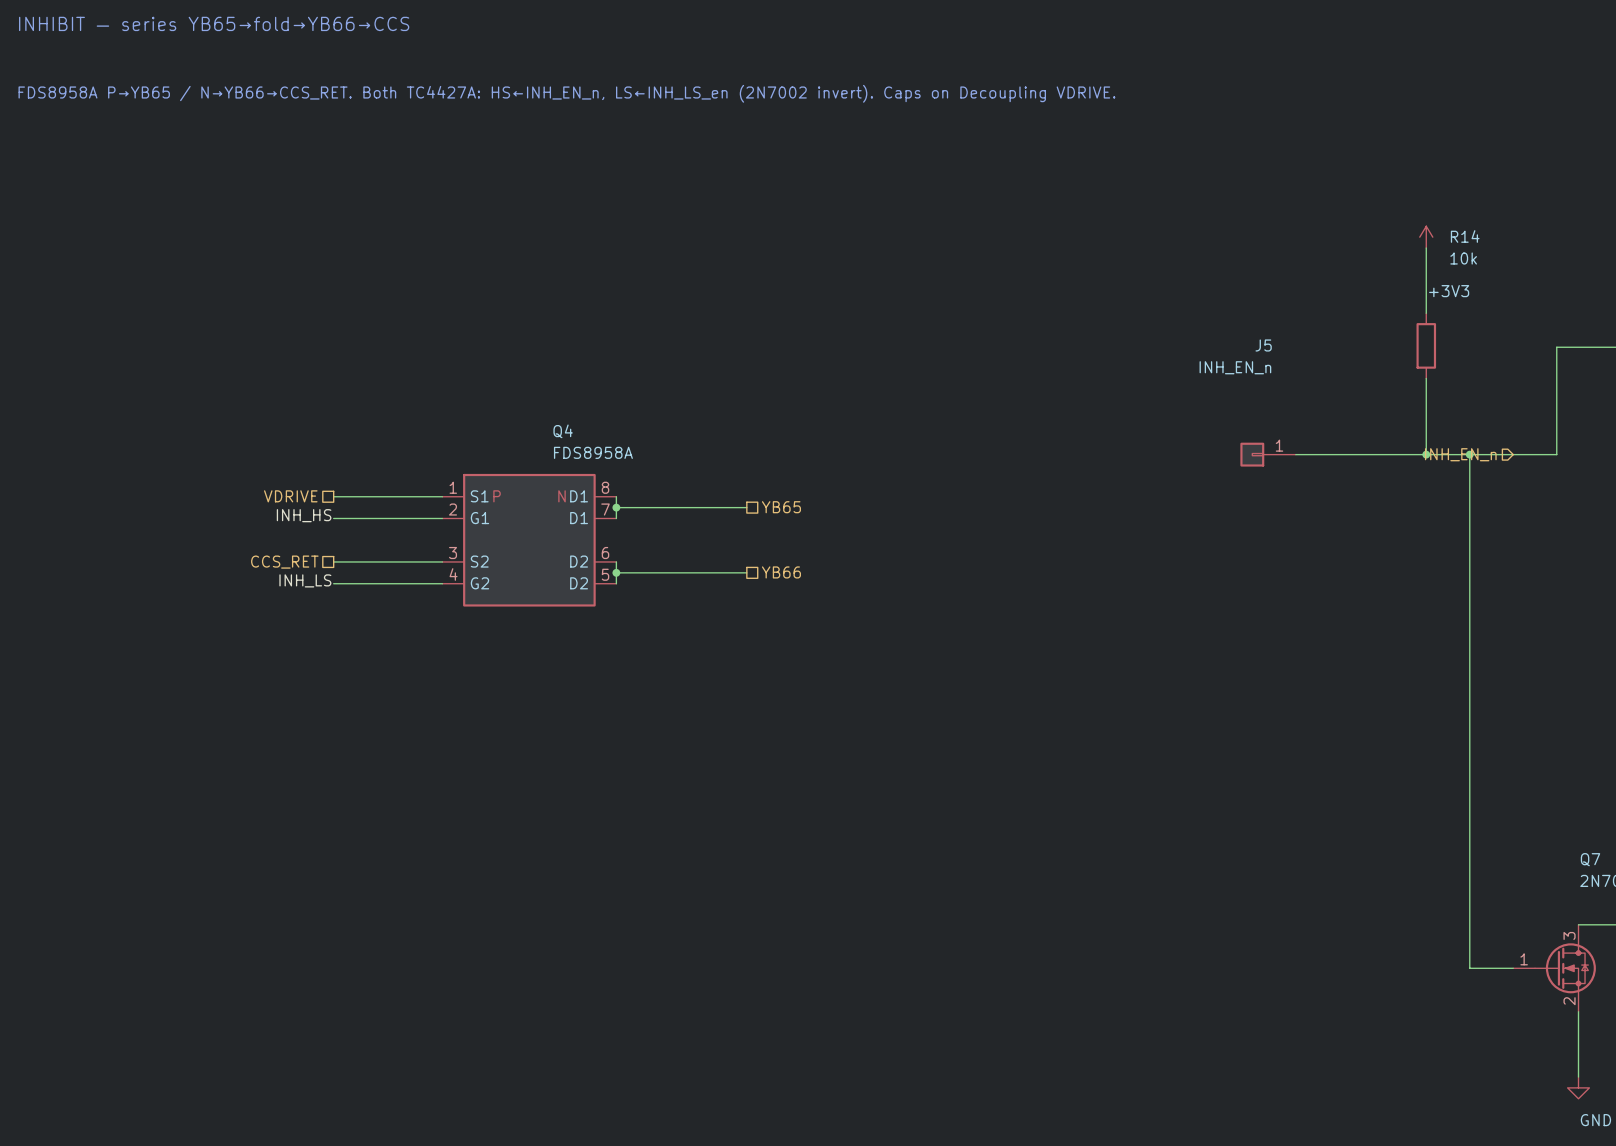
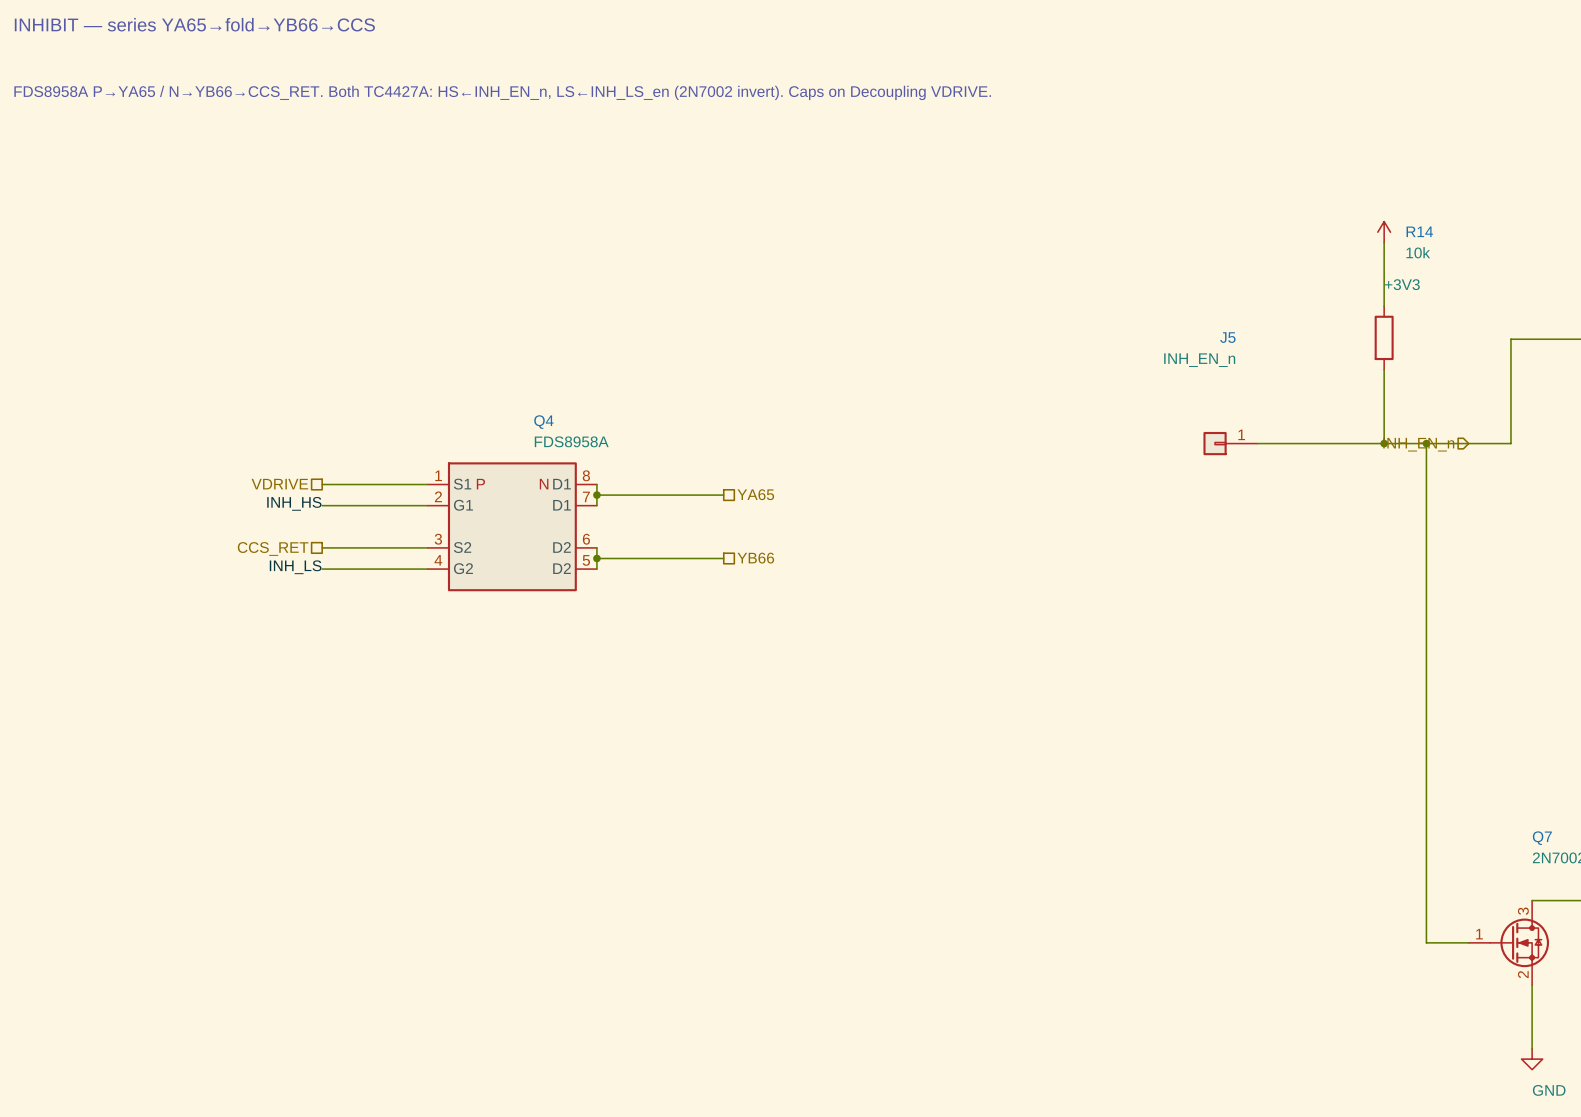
text: INHIBIT — series YB65→fold→YB66→CCS (214, 23) -> INHIBIT — series YA65→fold→YB66→CCS (194, 24)
text: FDS8958A P→YB65 / N→YB66→CCS_RET. Both TC4427A: HS←INH_EN_n, LS←INH_LS_en (2N7002 invert). Caps on Decoupling VDRIVE. (566, 93) -> FDS8958A P→YA65 / N→YB66→CCS_RET. Both TC4427A: HS←INH_EN_n, LS←INH_LS_en (2N7002 invert). Caps on Decoupling VDRIVE. (502, 92)
hierarchical label: YB65 (781, 507) -> YA65 (755, 494)

